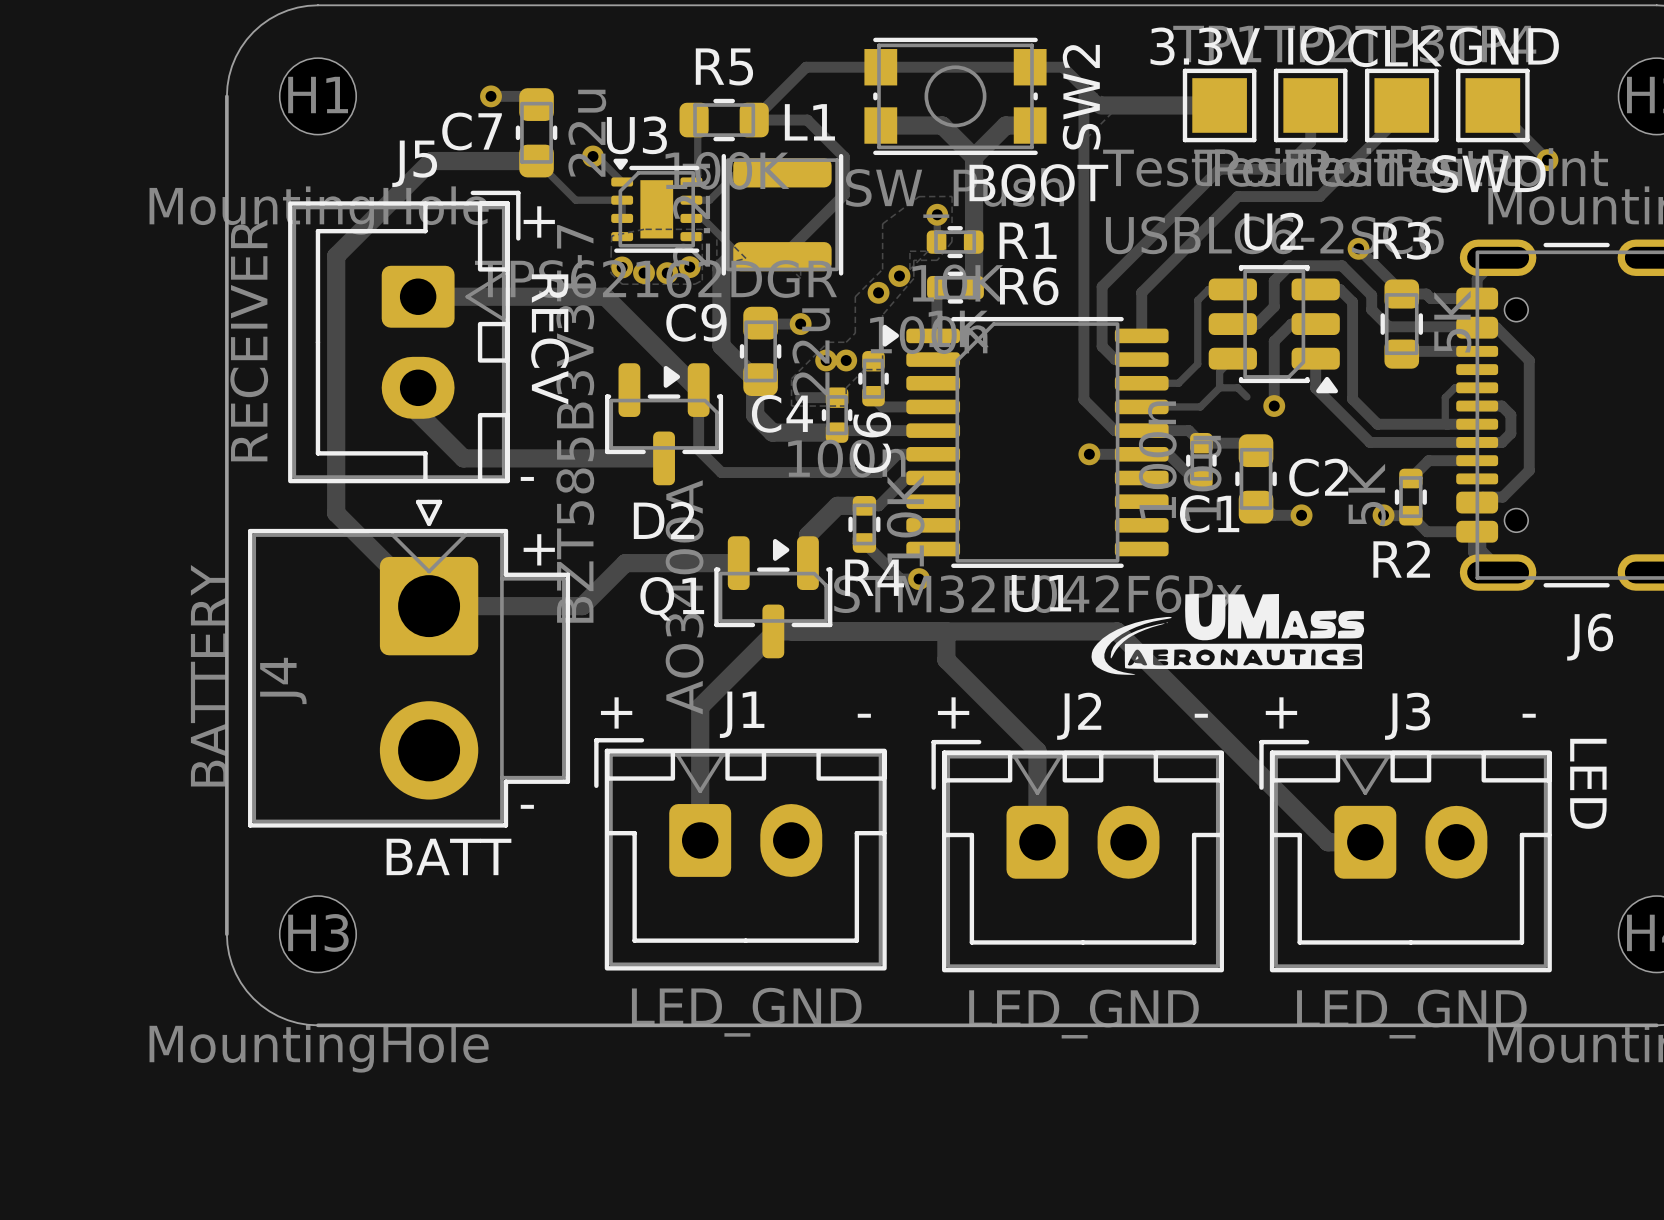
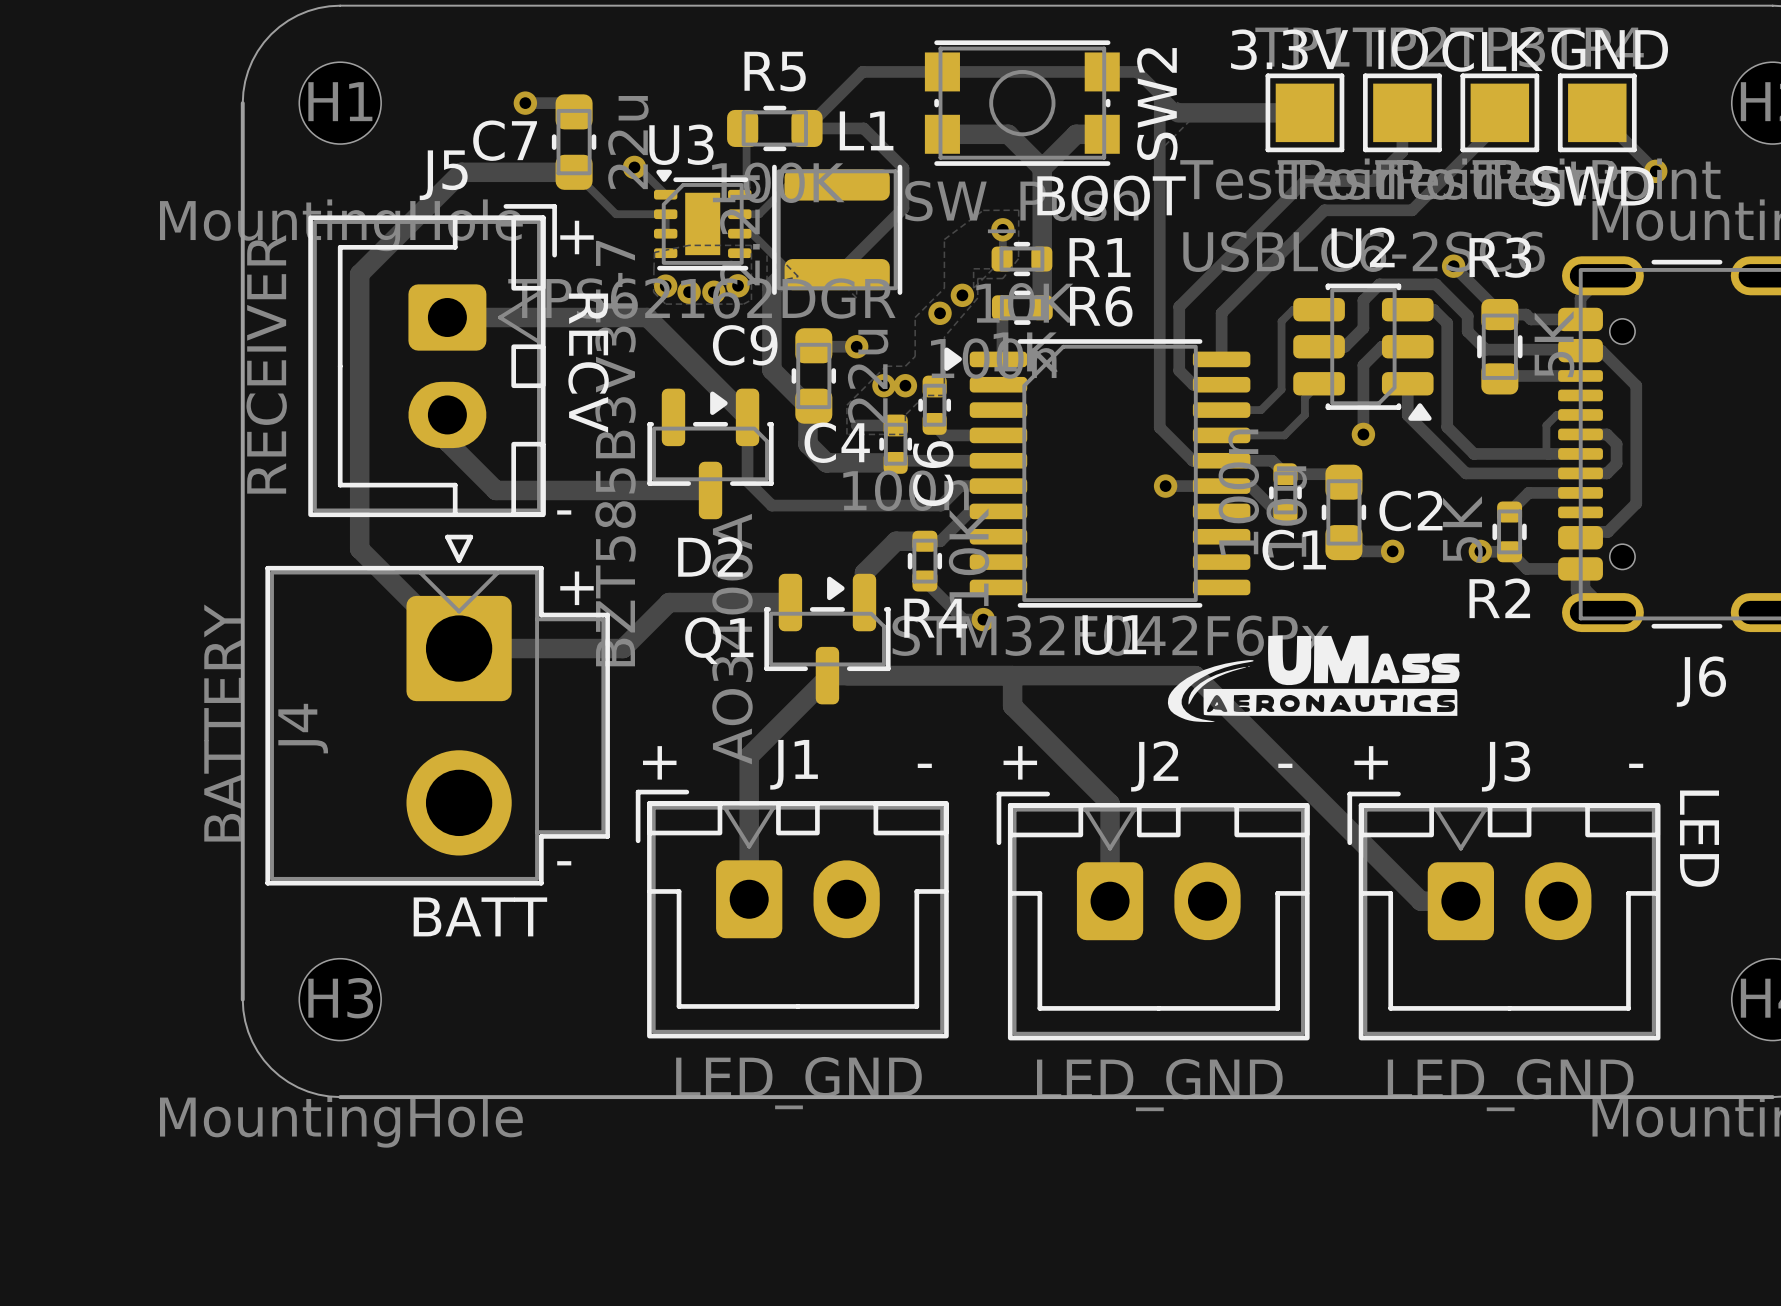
track: (1219, 387) (1237, 387) (1246, 396) -> none

